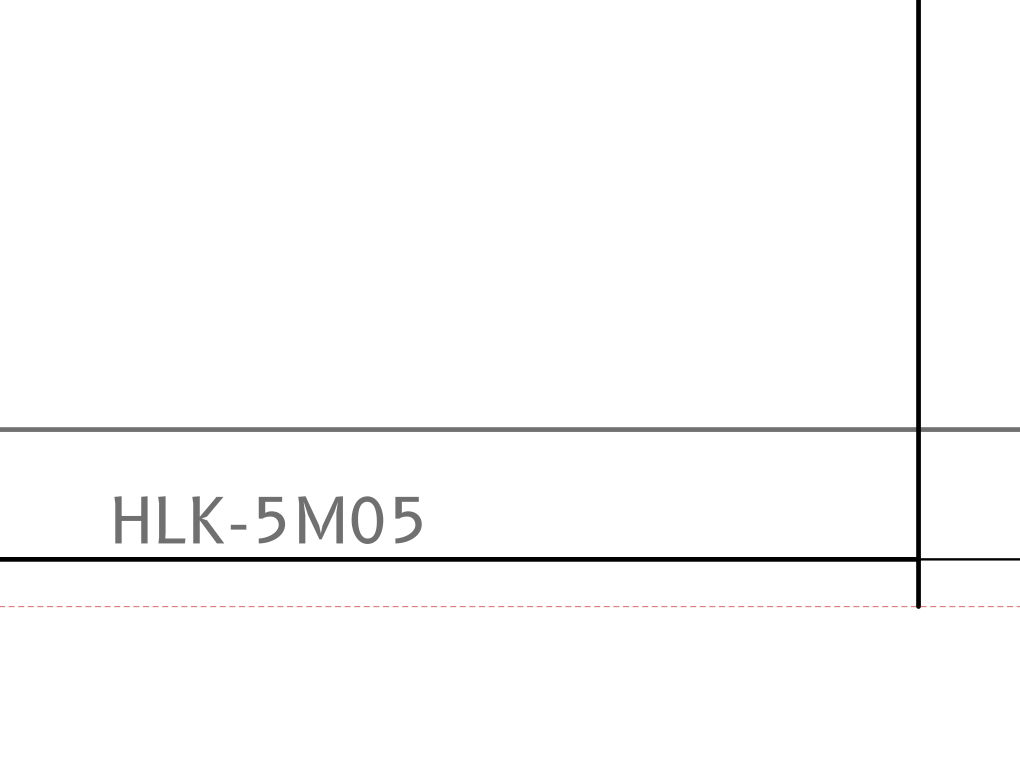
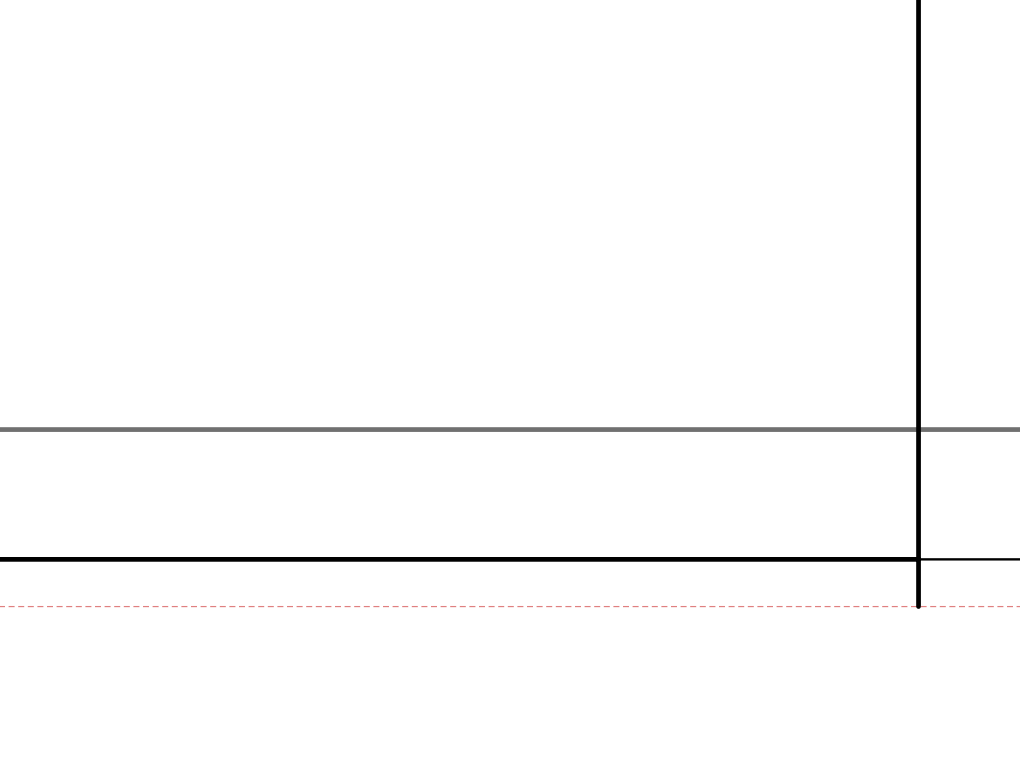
part value: HLK-5M05 (268, 520) -> none

